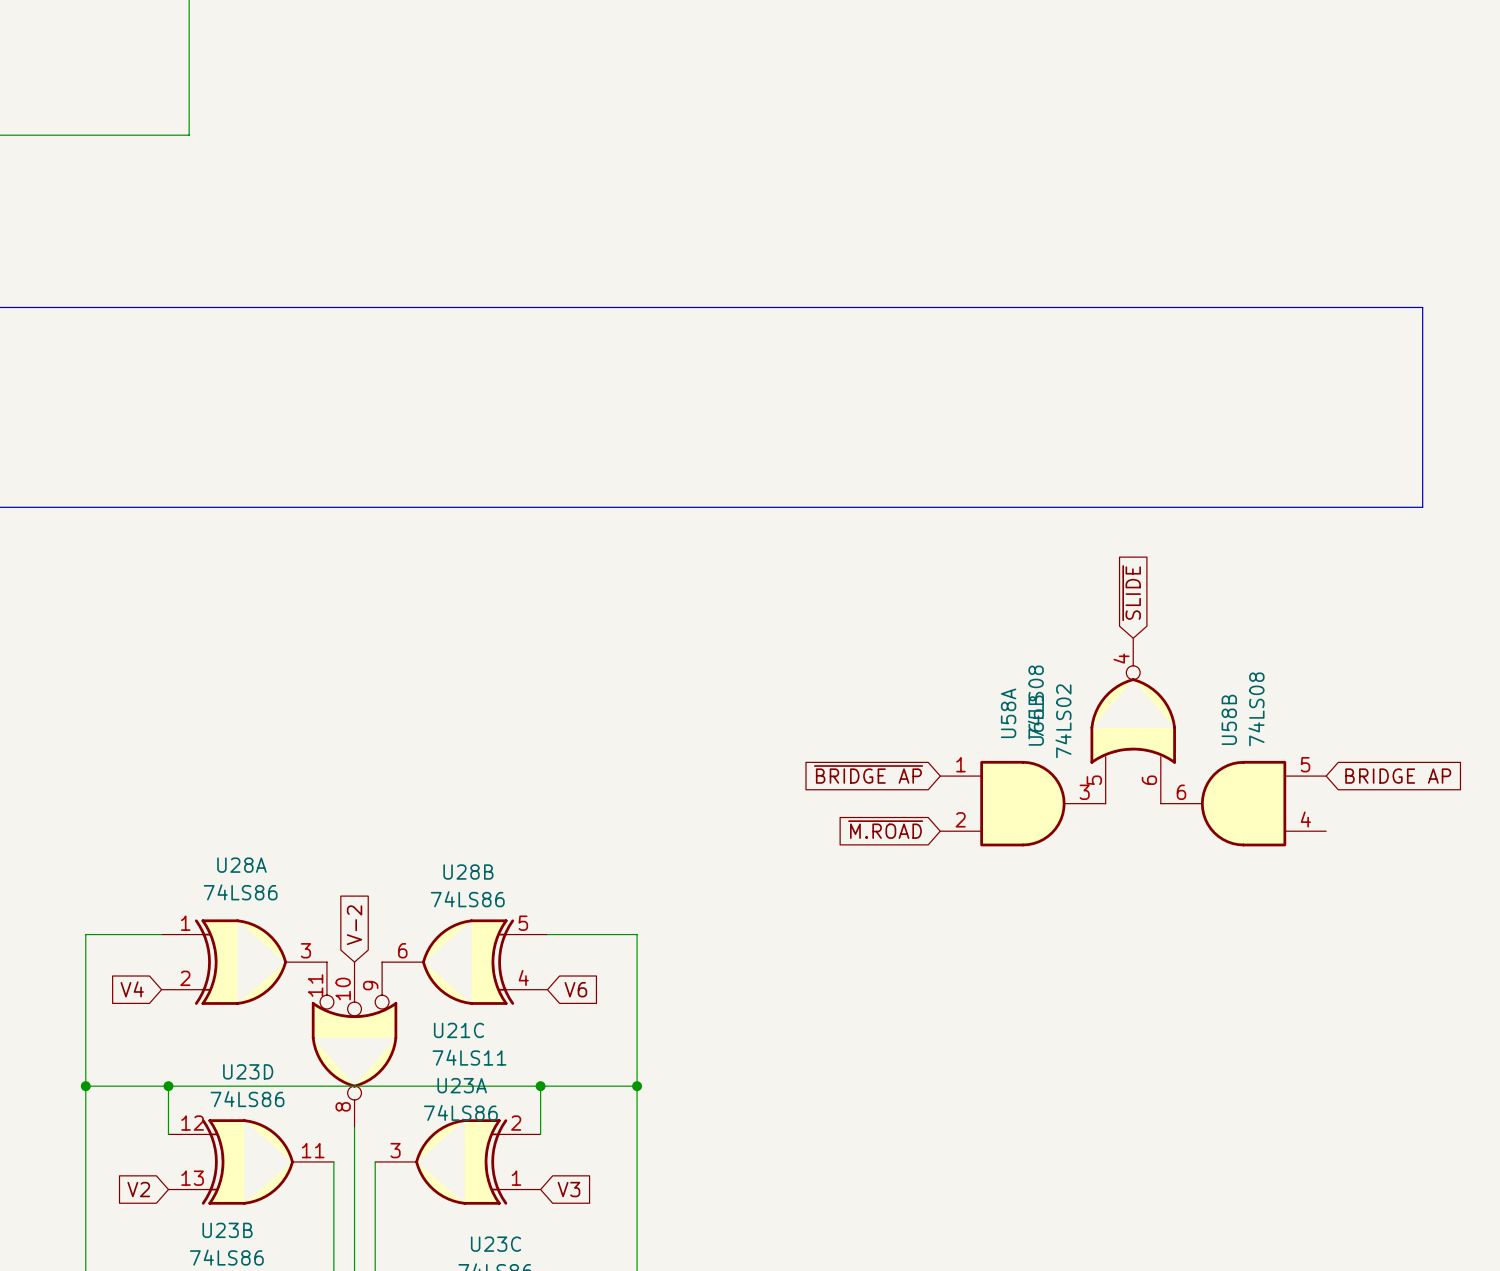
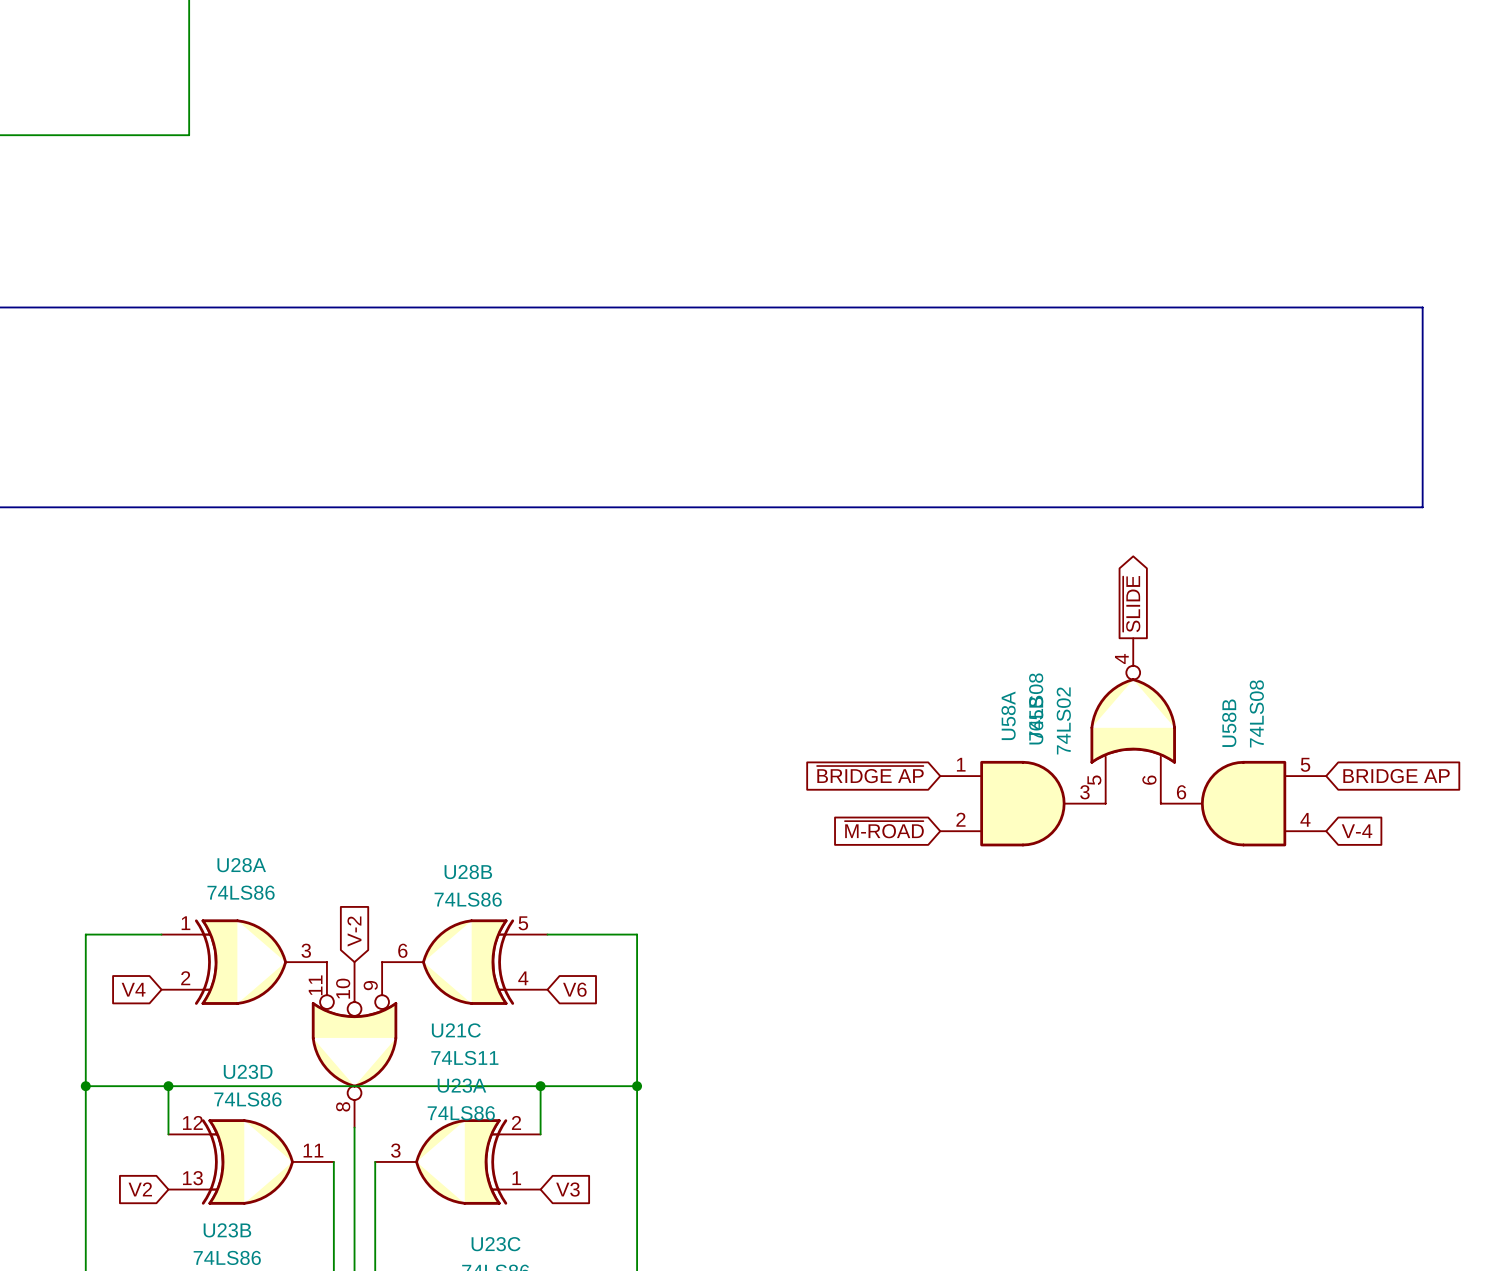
global label shape: input (1131, 593) -> output (1131, 604)
global label: ~{M.ROAD} (885, 829) -> ~{M-ROAD} (884, 829)
global label: none -> V-4 (1357, 831)

